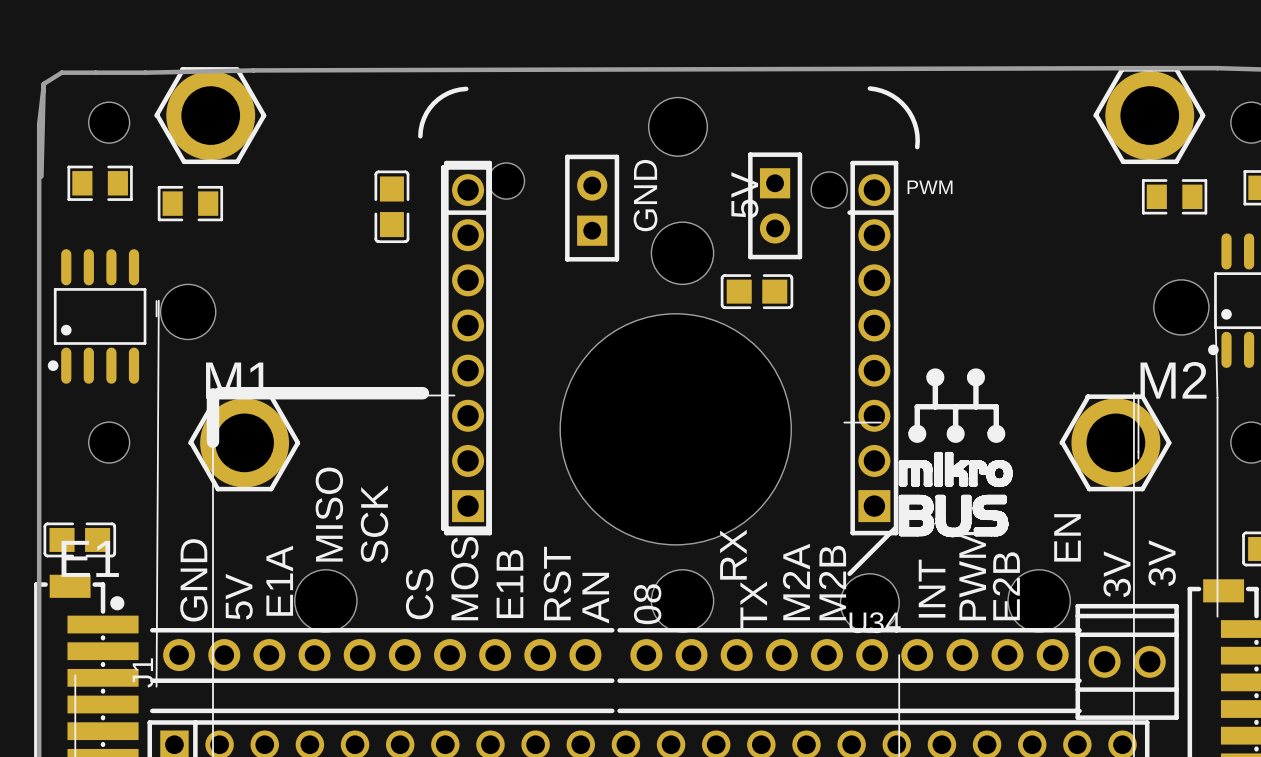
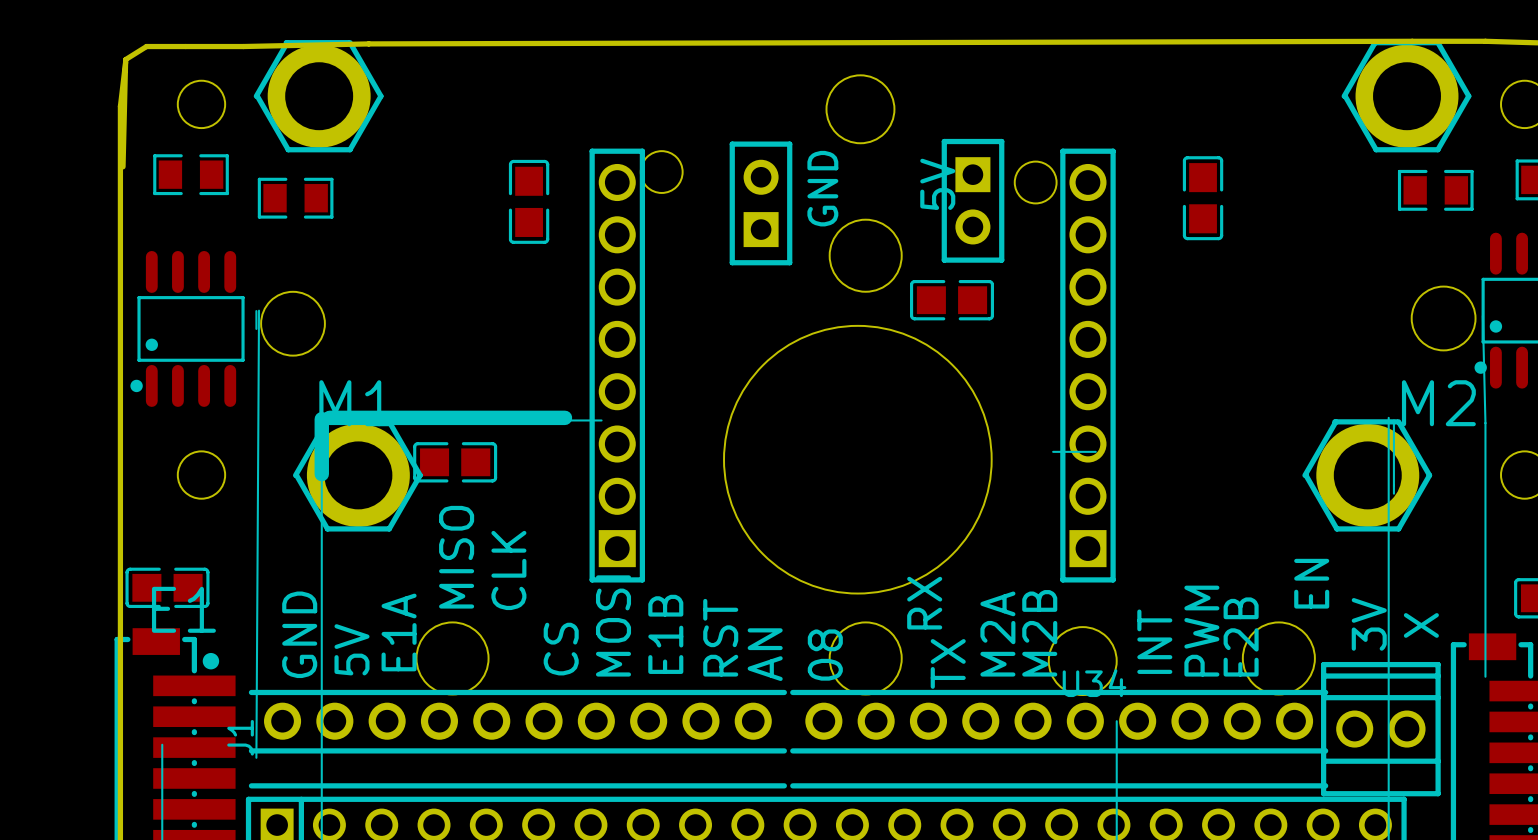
drawing: [418, 86, 1013, 577] -> none
part: none -> (1203, 198)
part: none -> (455, 462)
text: SCK (374, 524) -> CLK (508, 570)
text: 3V (1162, 563) -> X (1421, 625)

